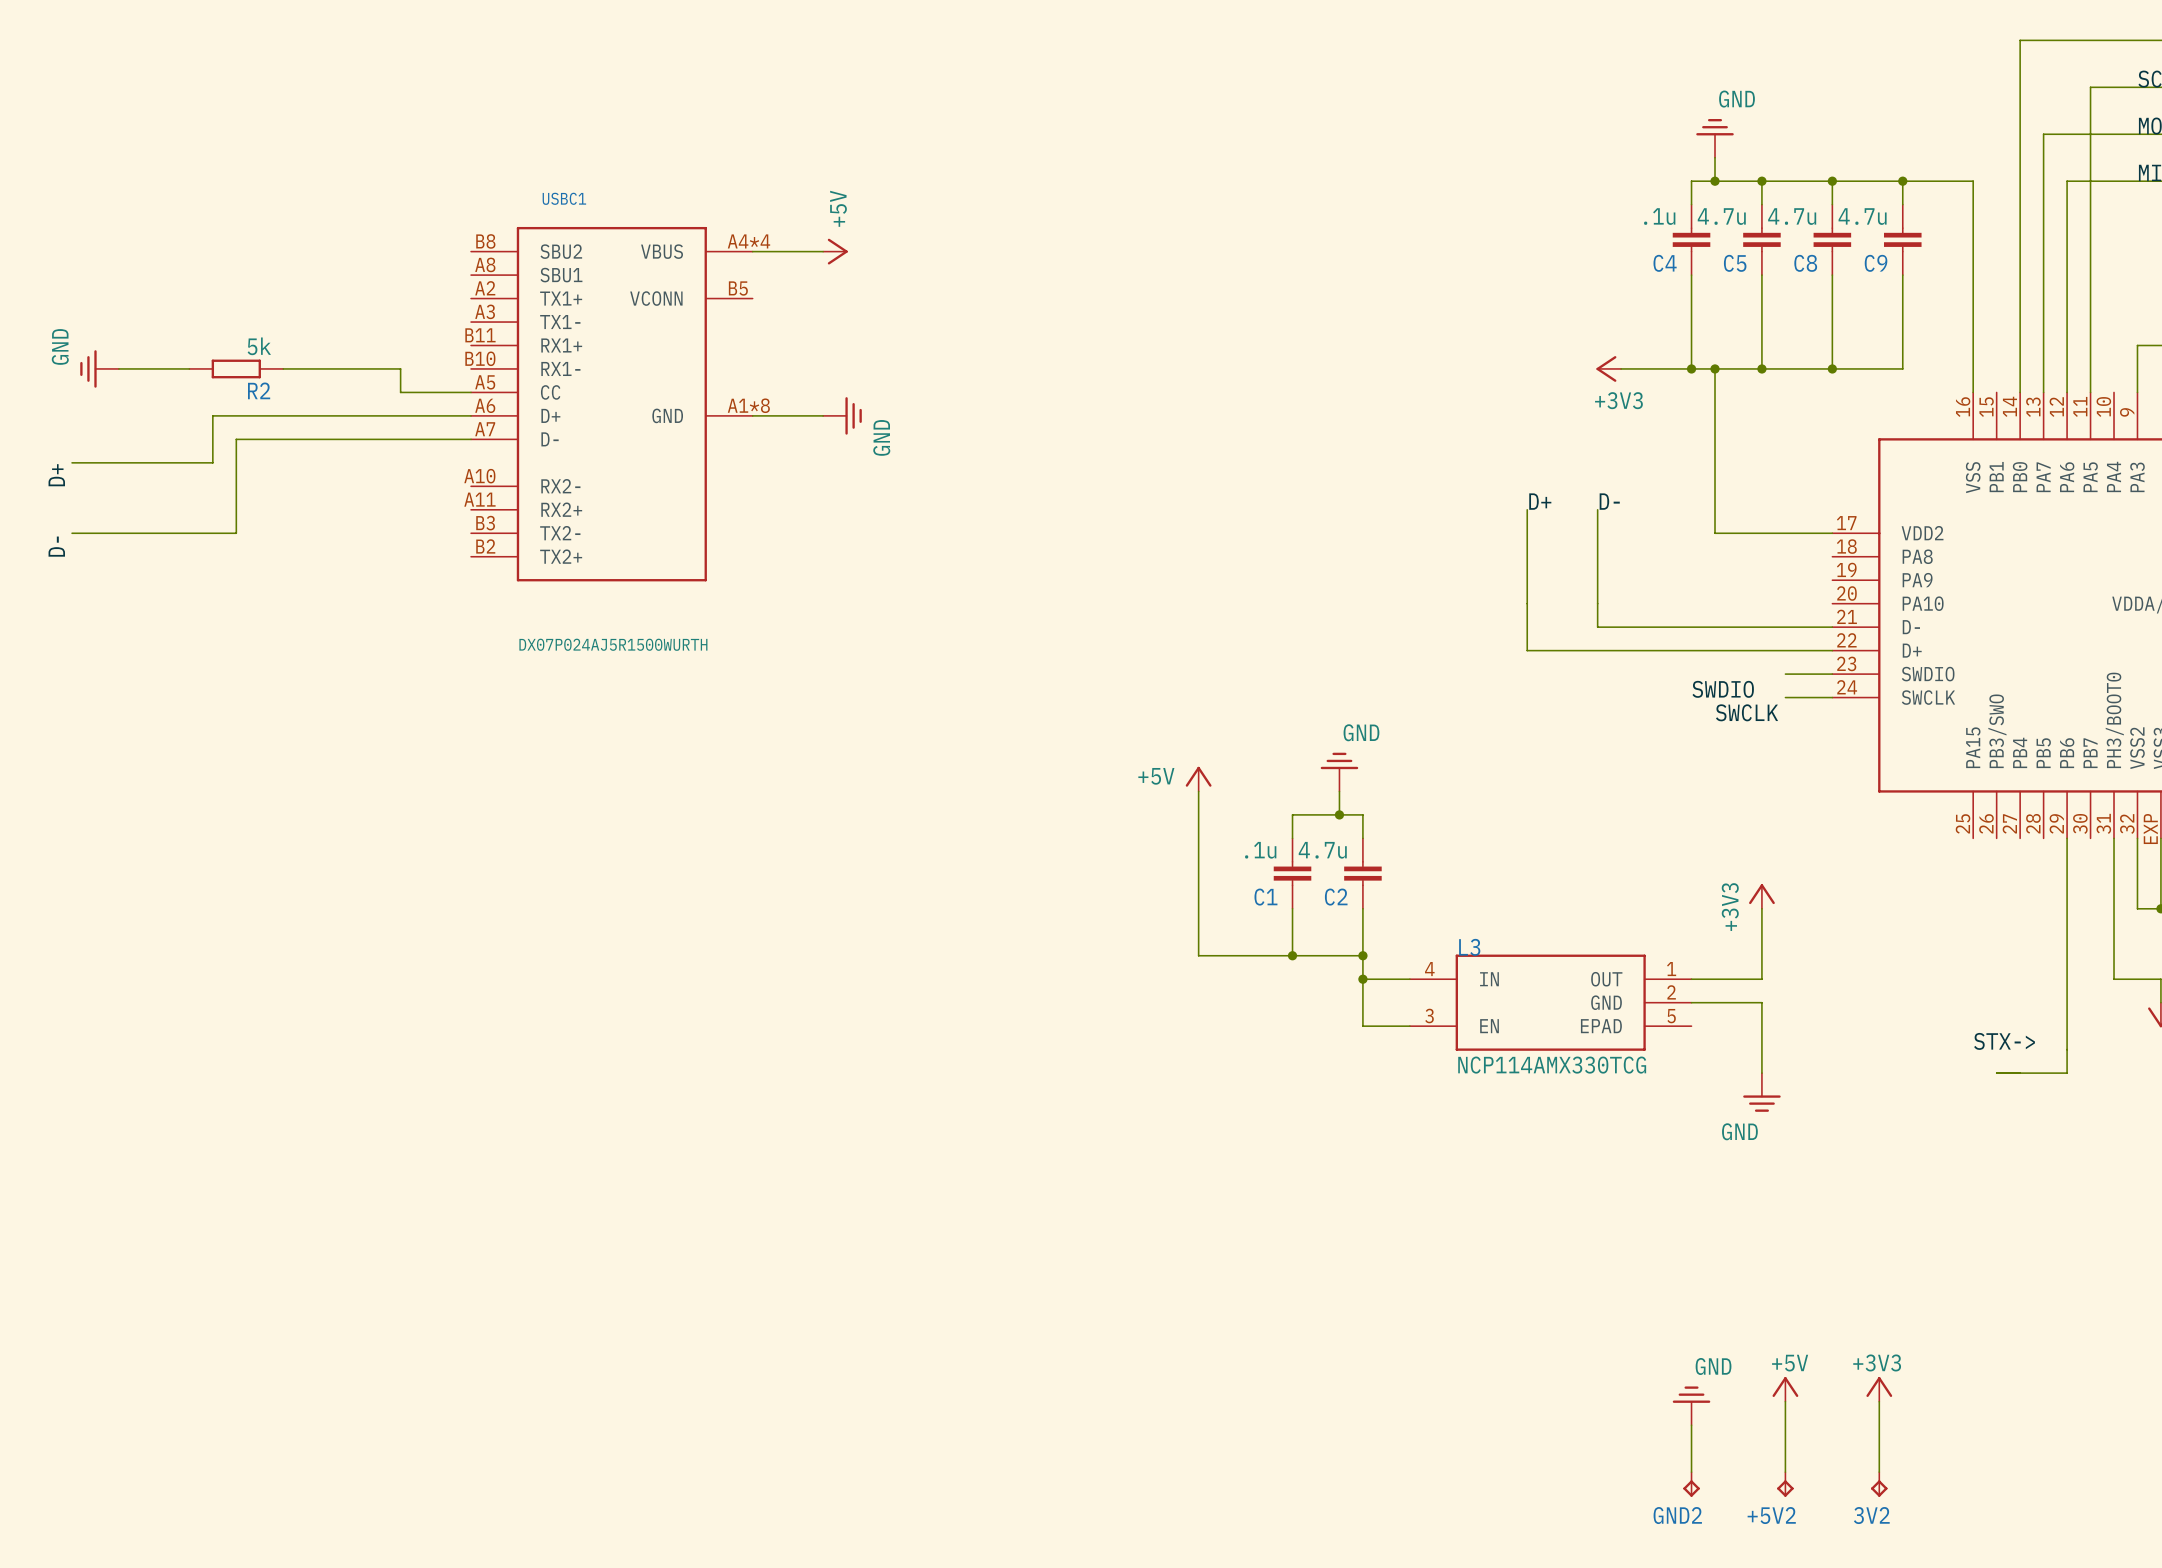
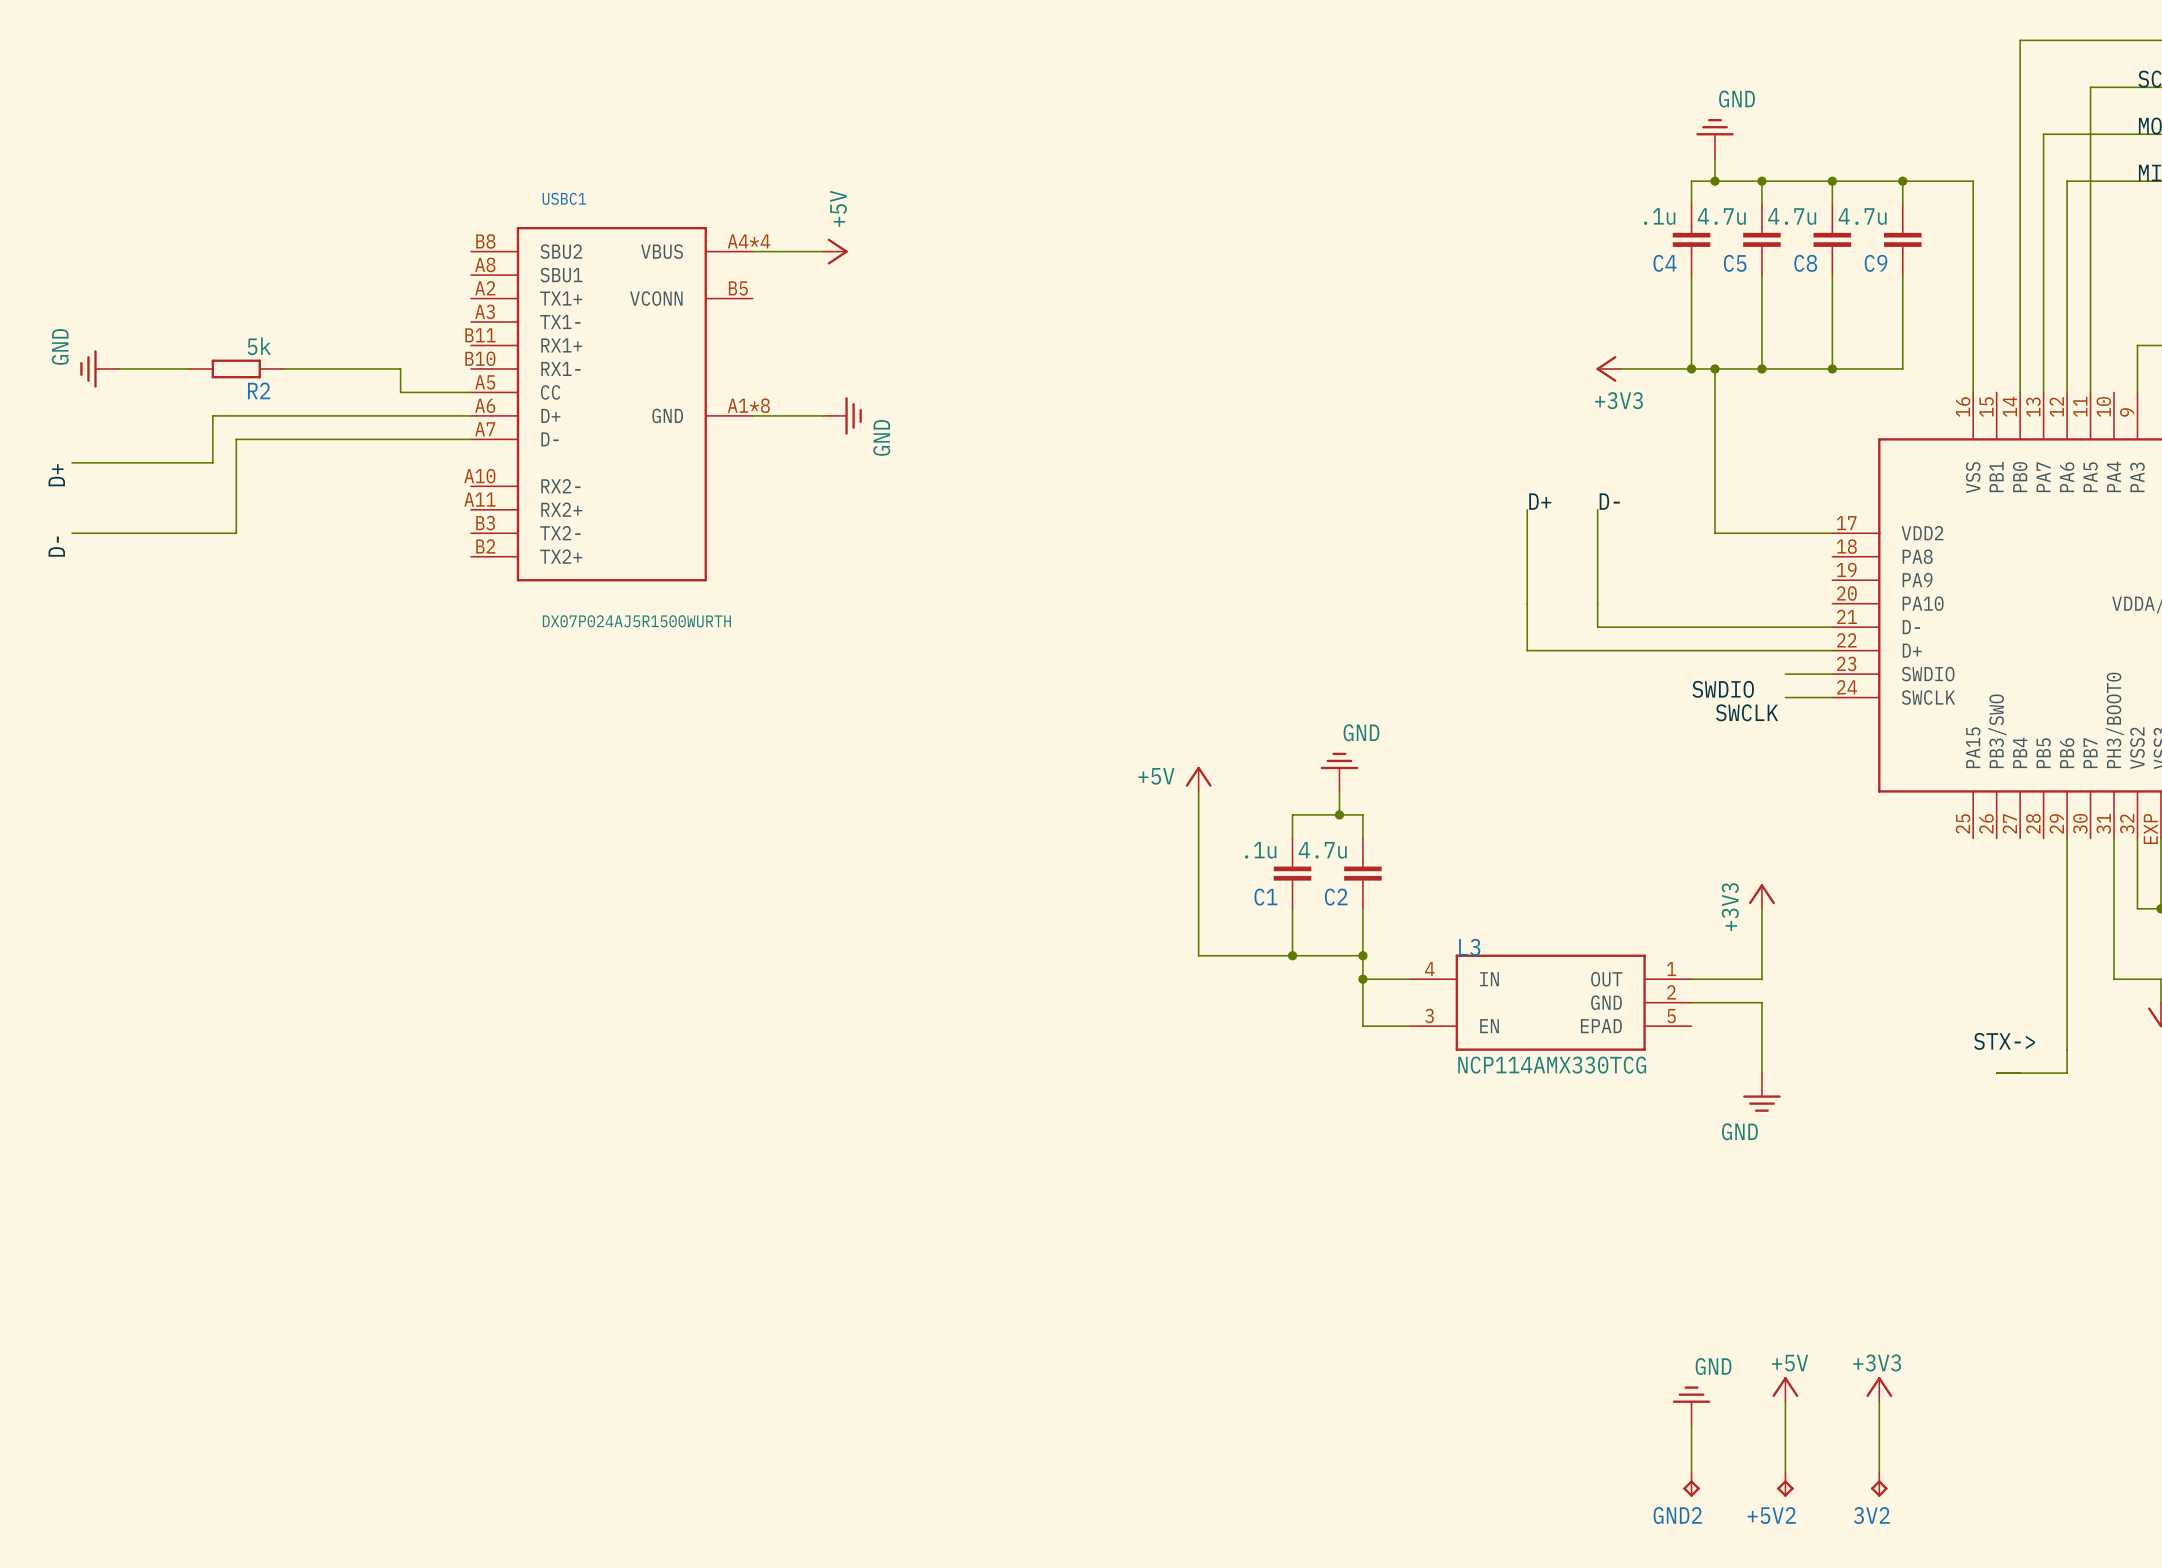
USBC1 value position: DX07P024AJ5R1500WURTH (613, 644) -> DX07P024AJ5R1500WURTH (636, 621)

